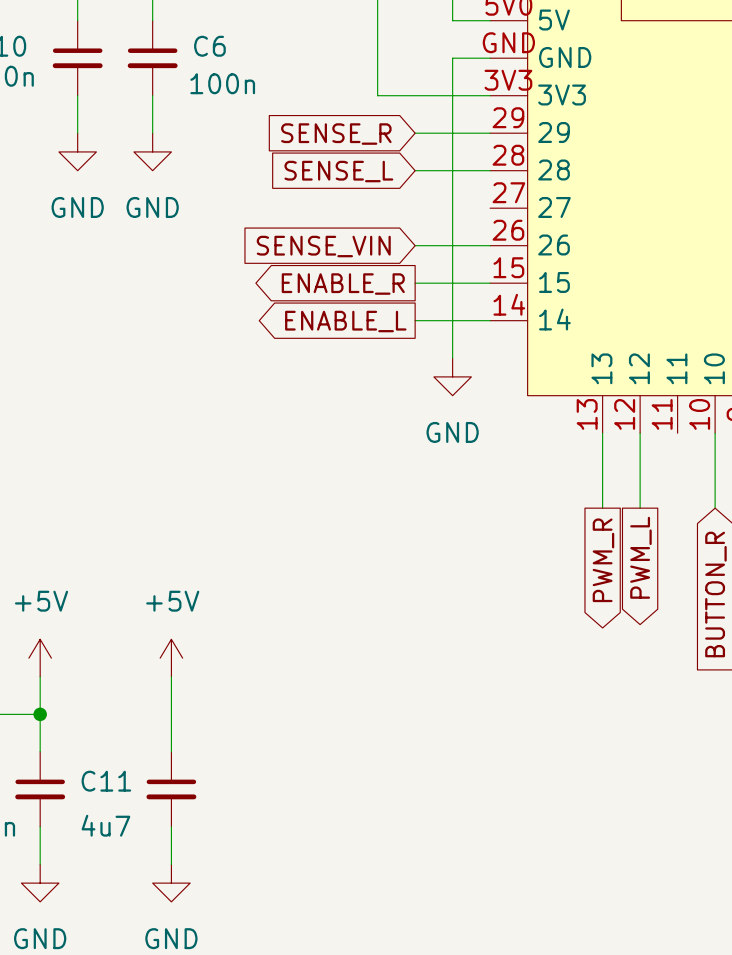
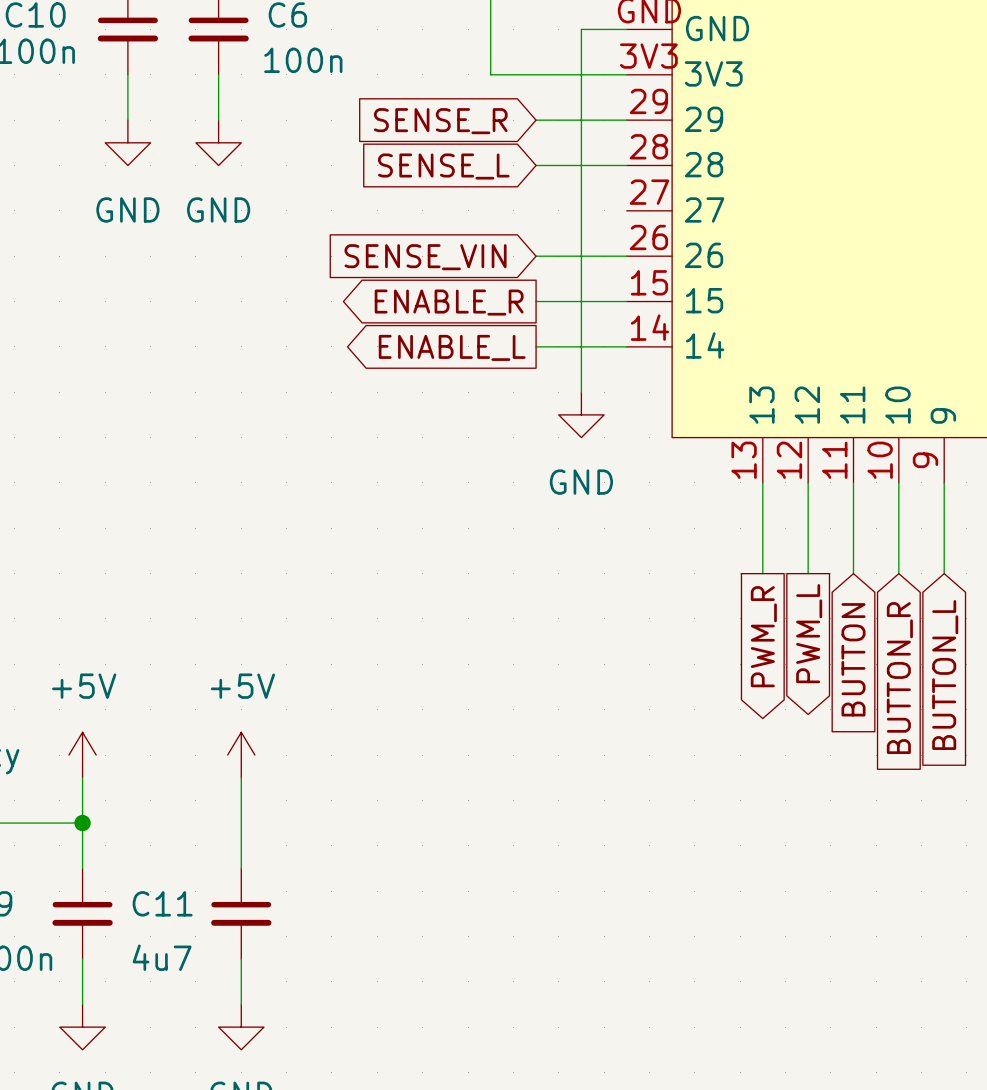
wire: none -> (853, 482) (853, 573)
global label: none -> BUTTON (853, 659)

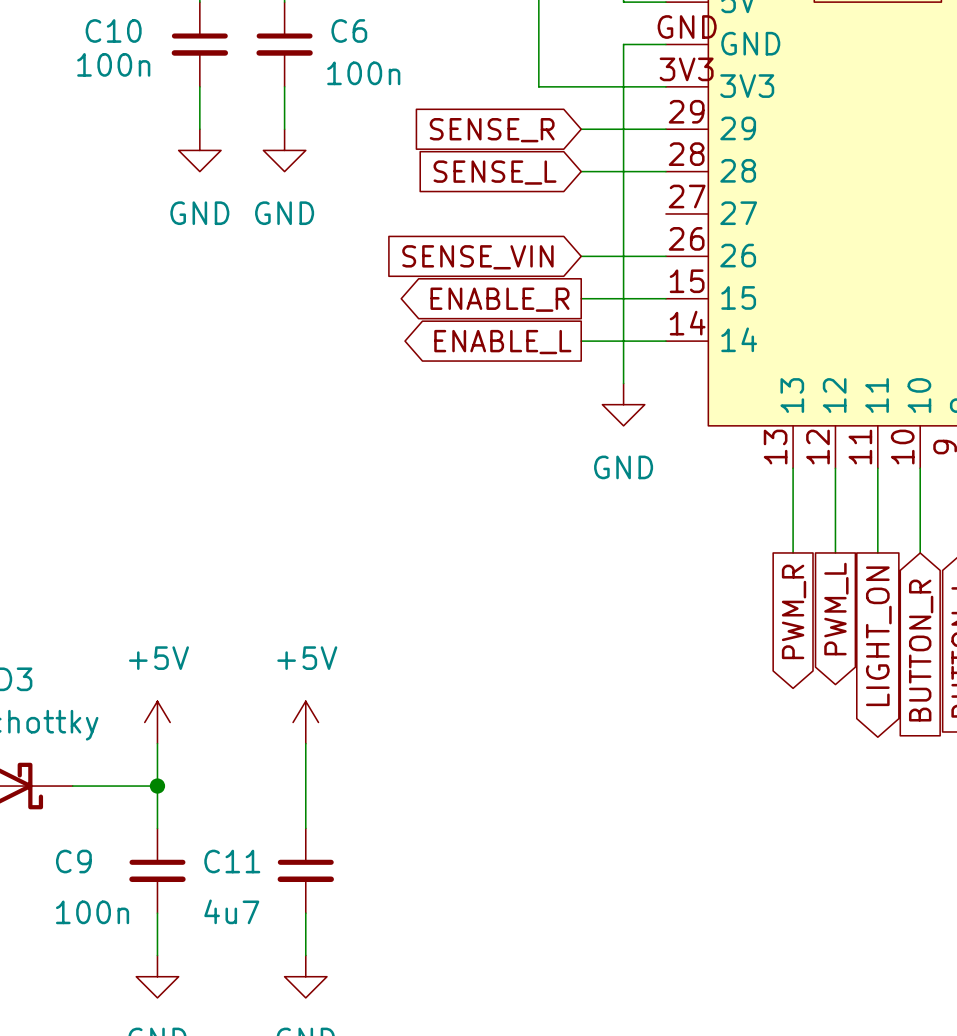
global label shape: input (853, 659) -> output (878, 636)
global label: BUTTON (853, 659) -> LIGHT_ON (878, 636)

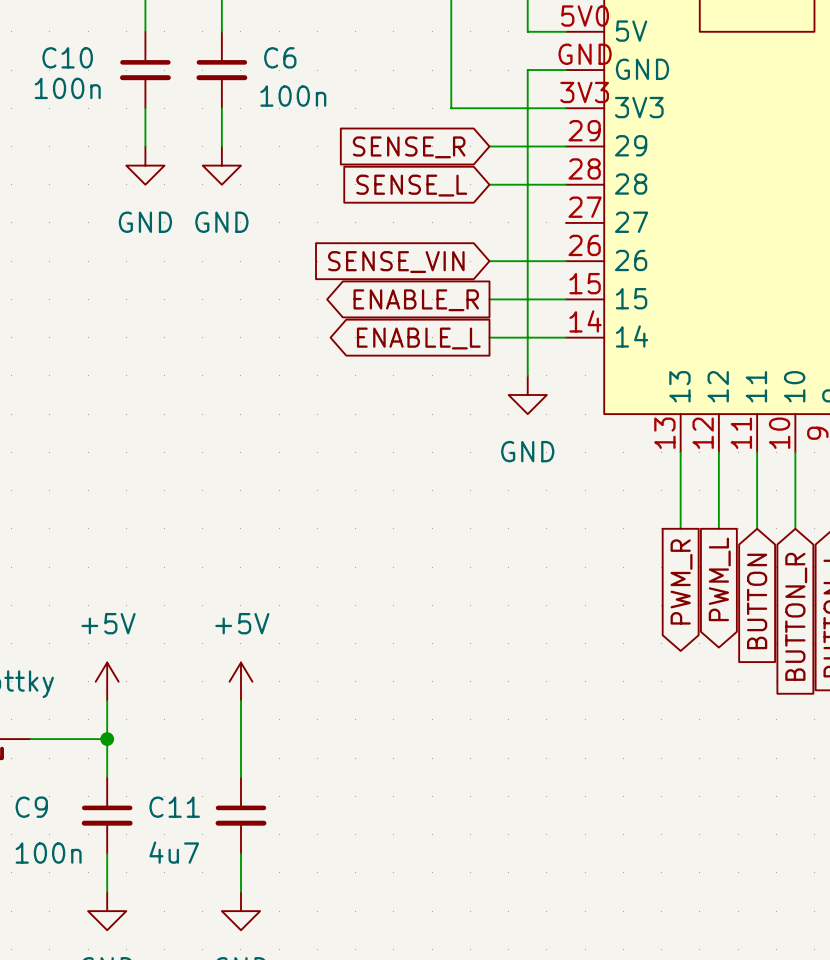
global label shape: output (878, 636) -> input (757, 601)
global label: LIGHT_ON (878, 636) -> BUTTON (757, 601)

